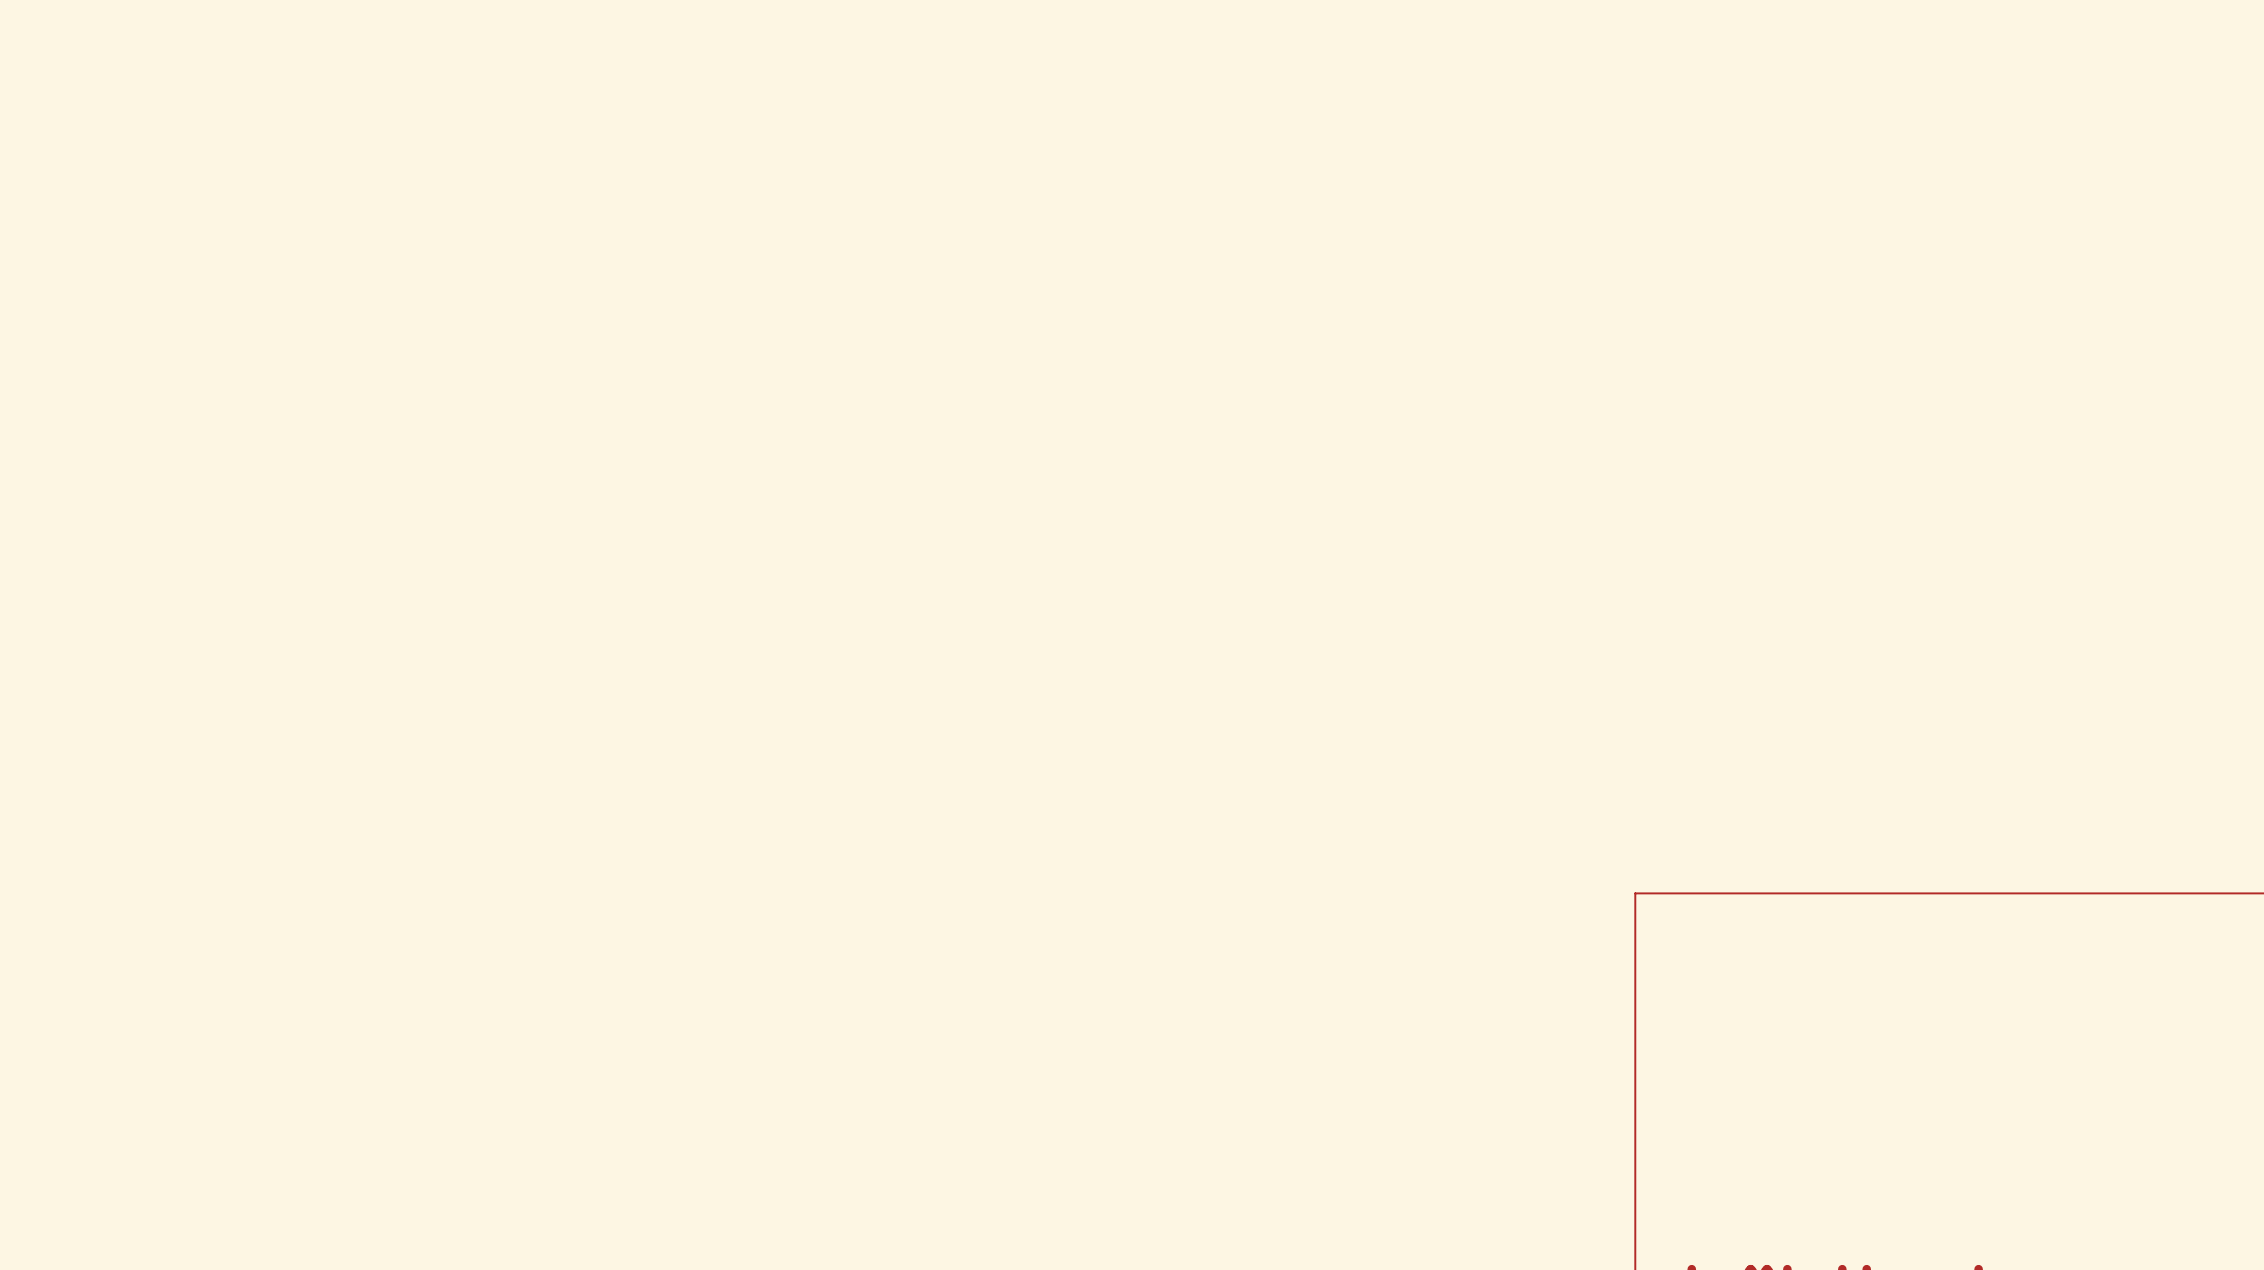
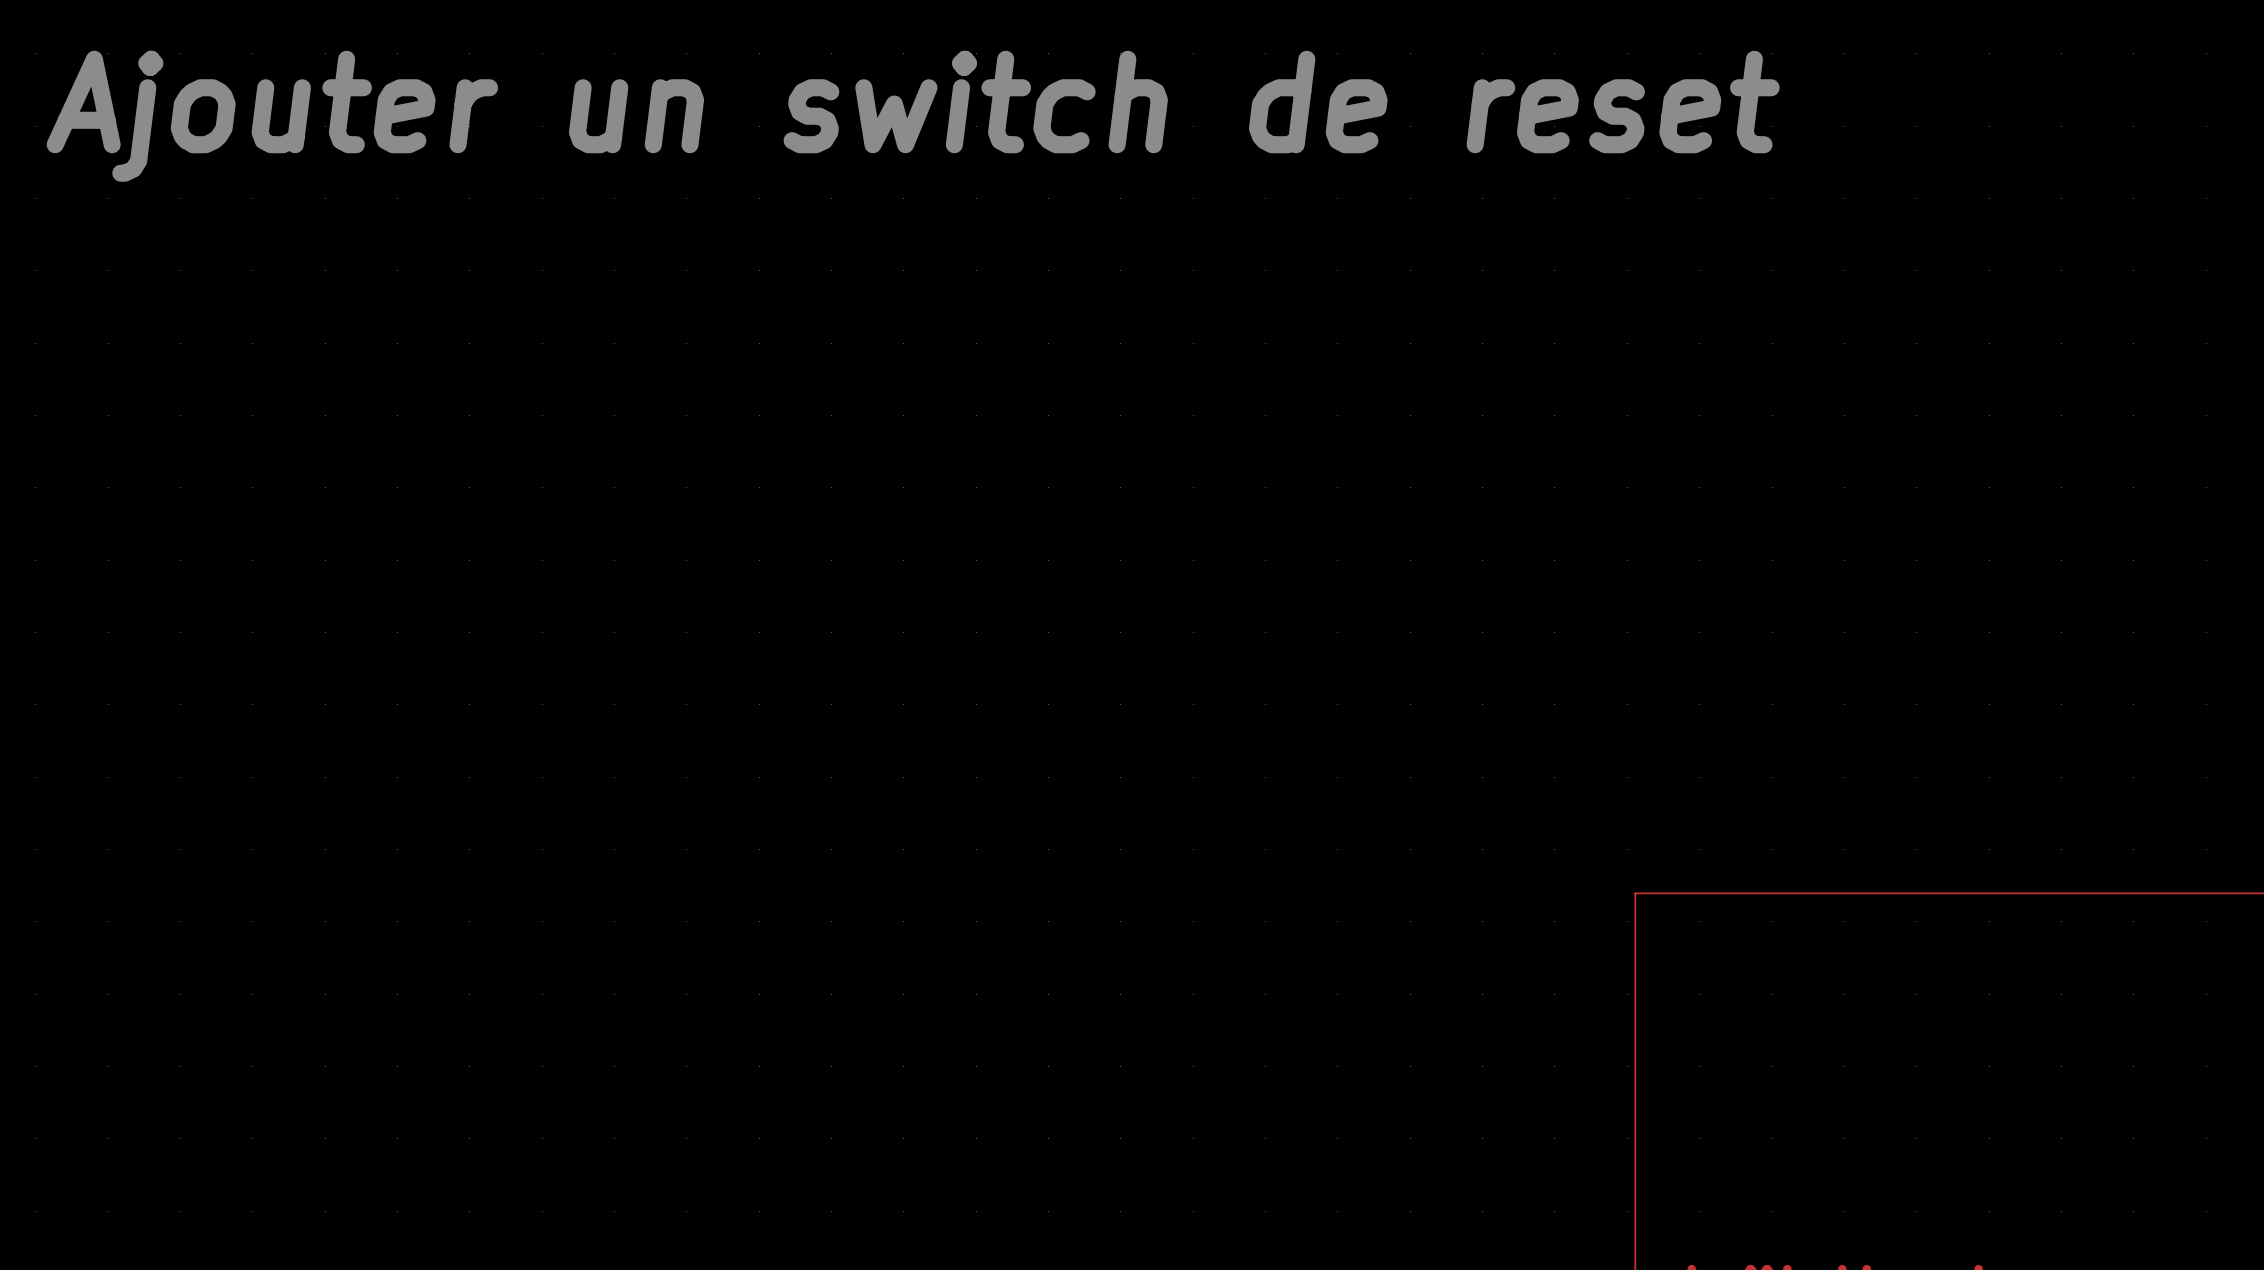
text: none -> Ajouter un switch de reset (913, 116)

